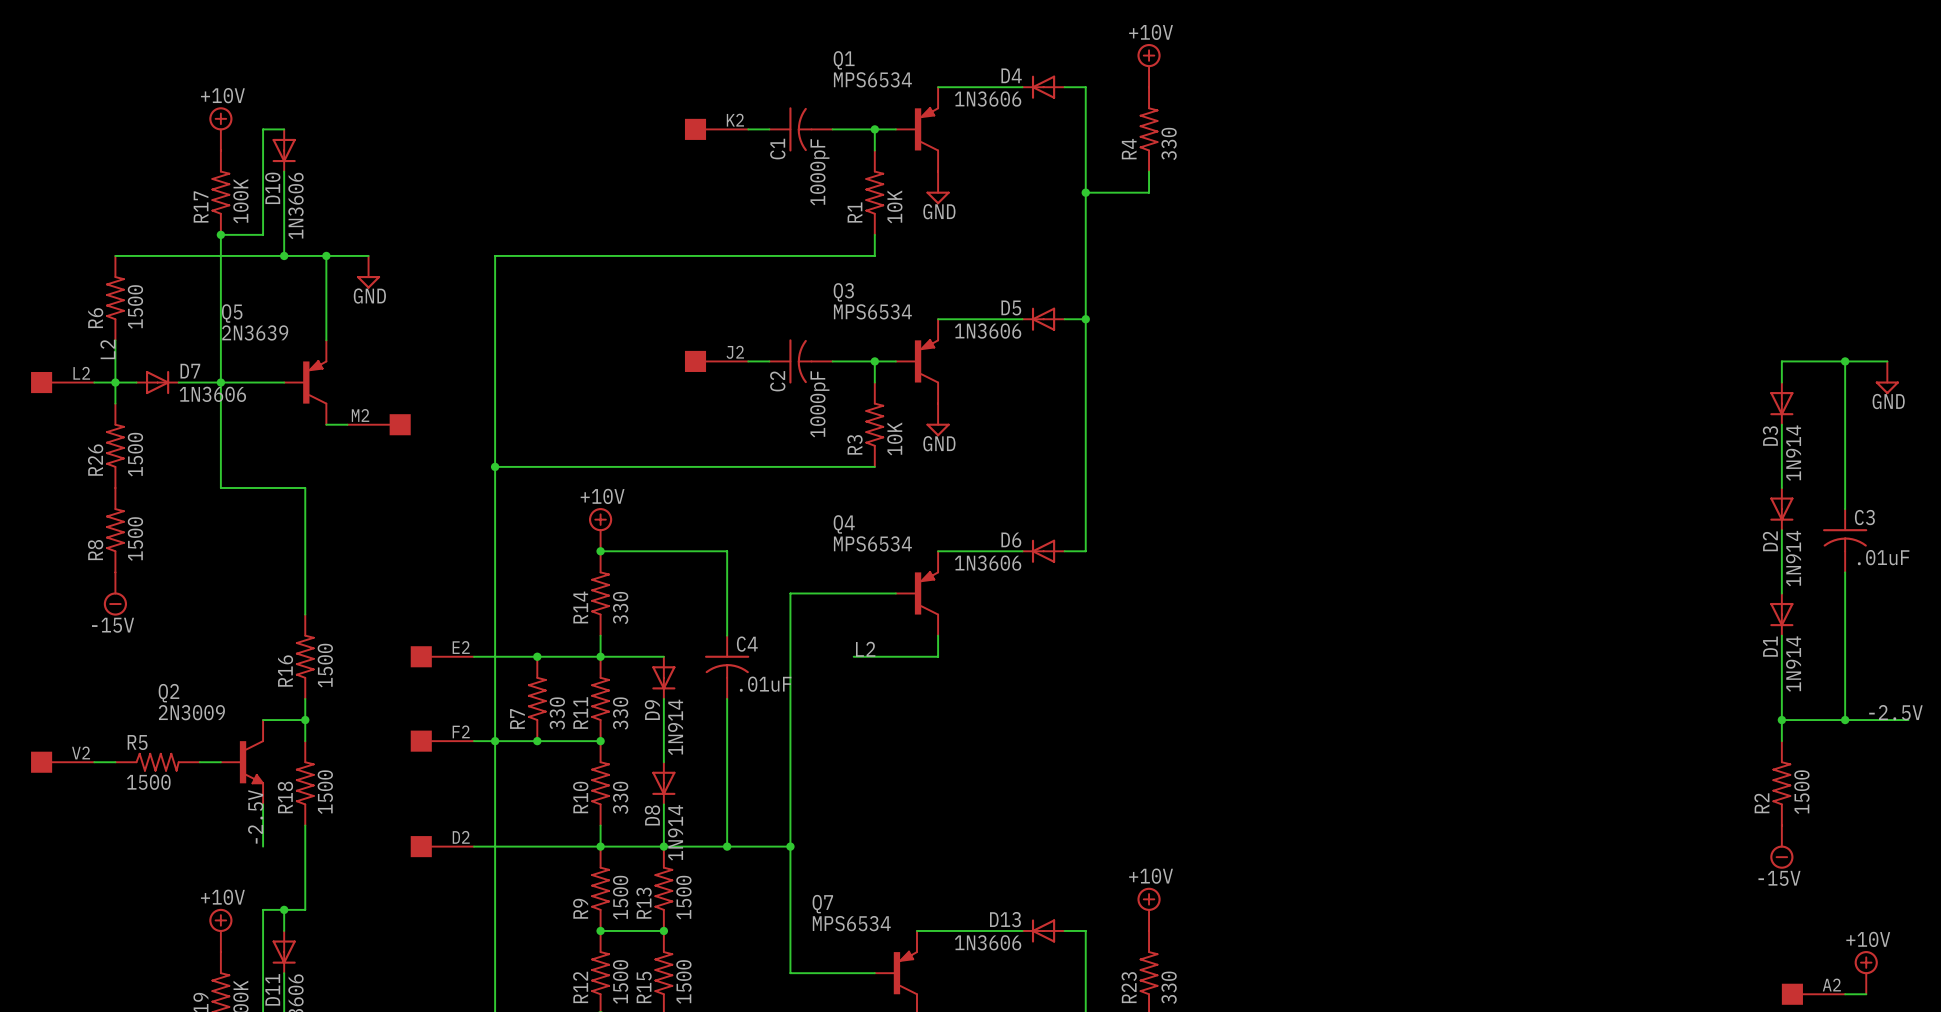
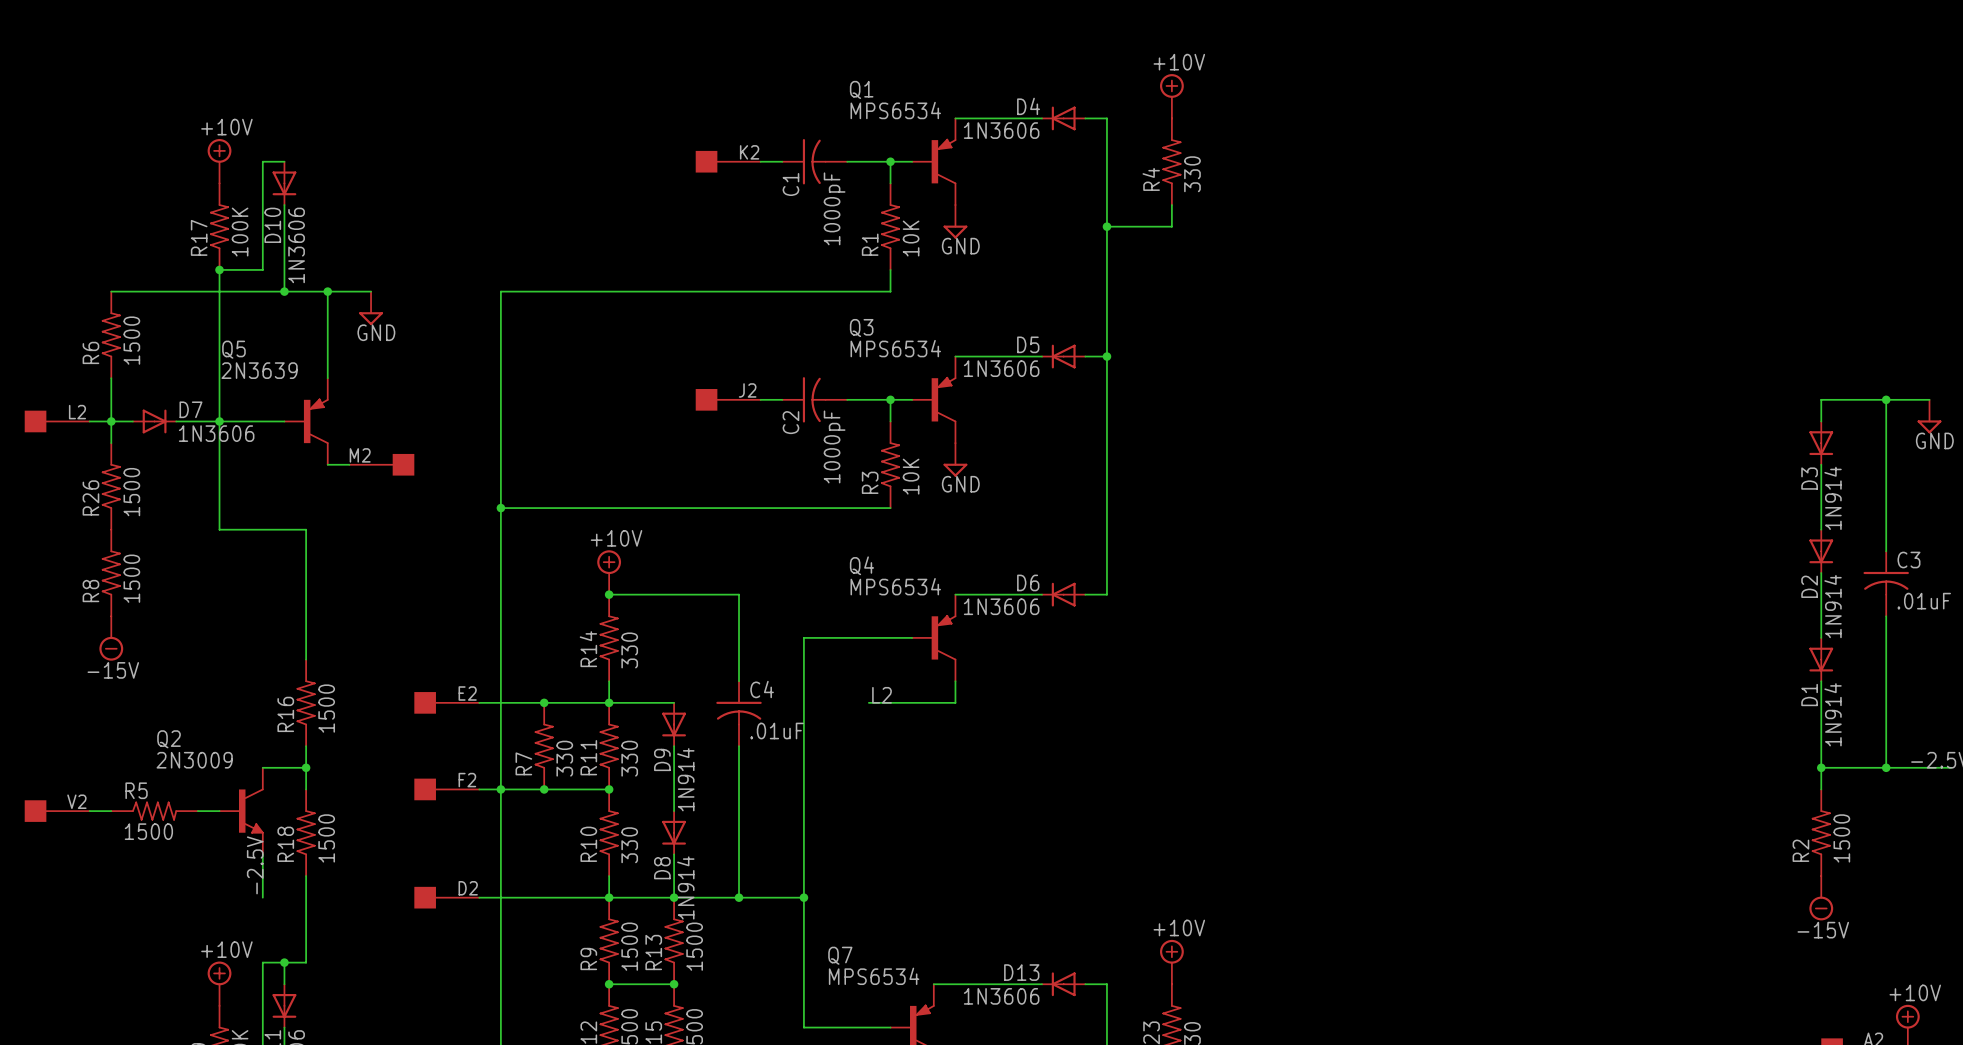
label: L2 (107, 349) -> none

